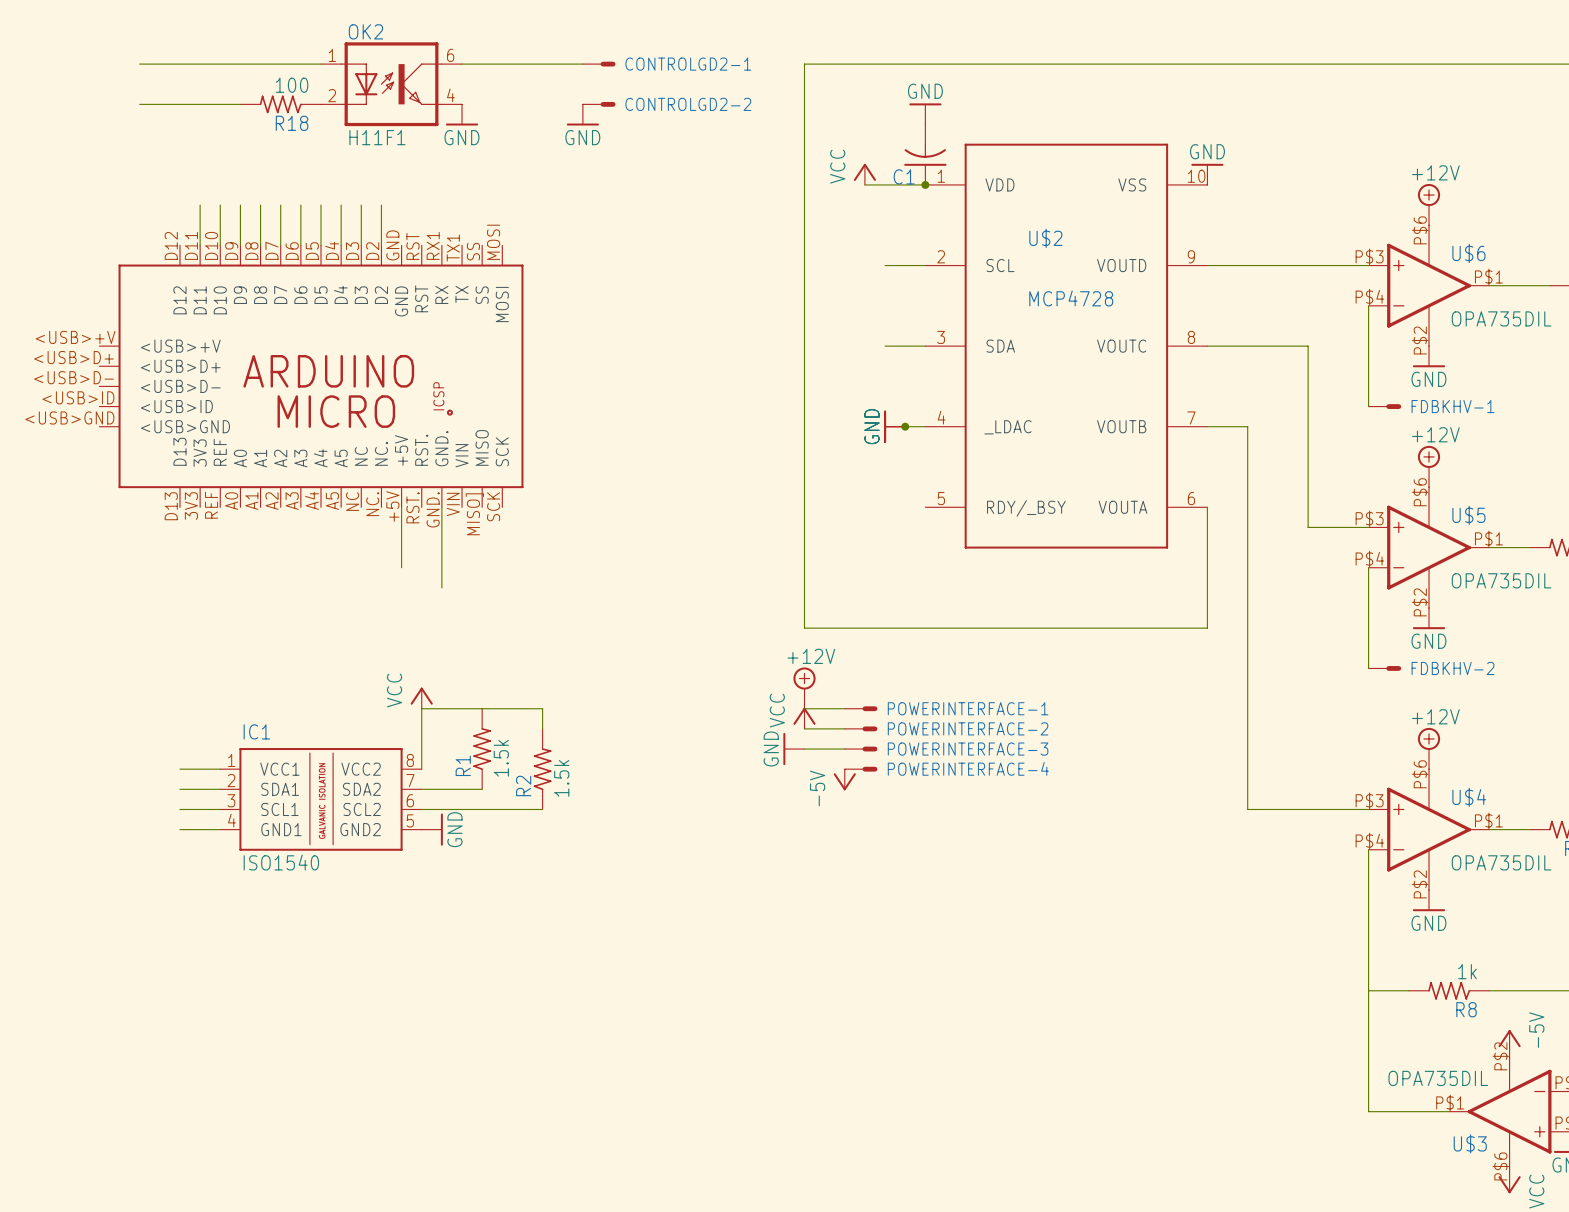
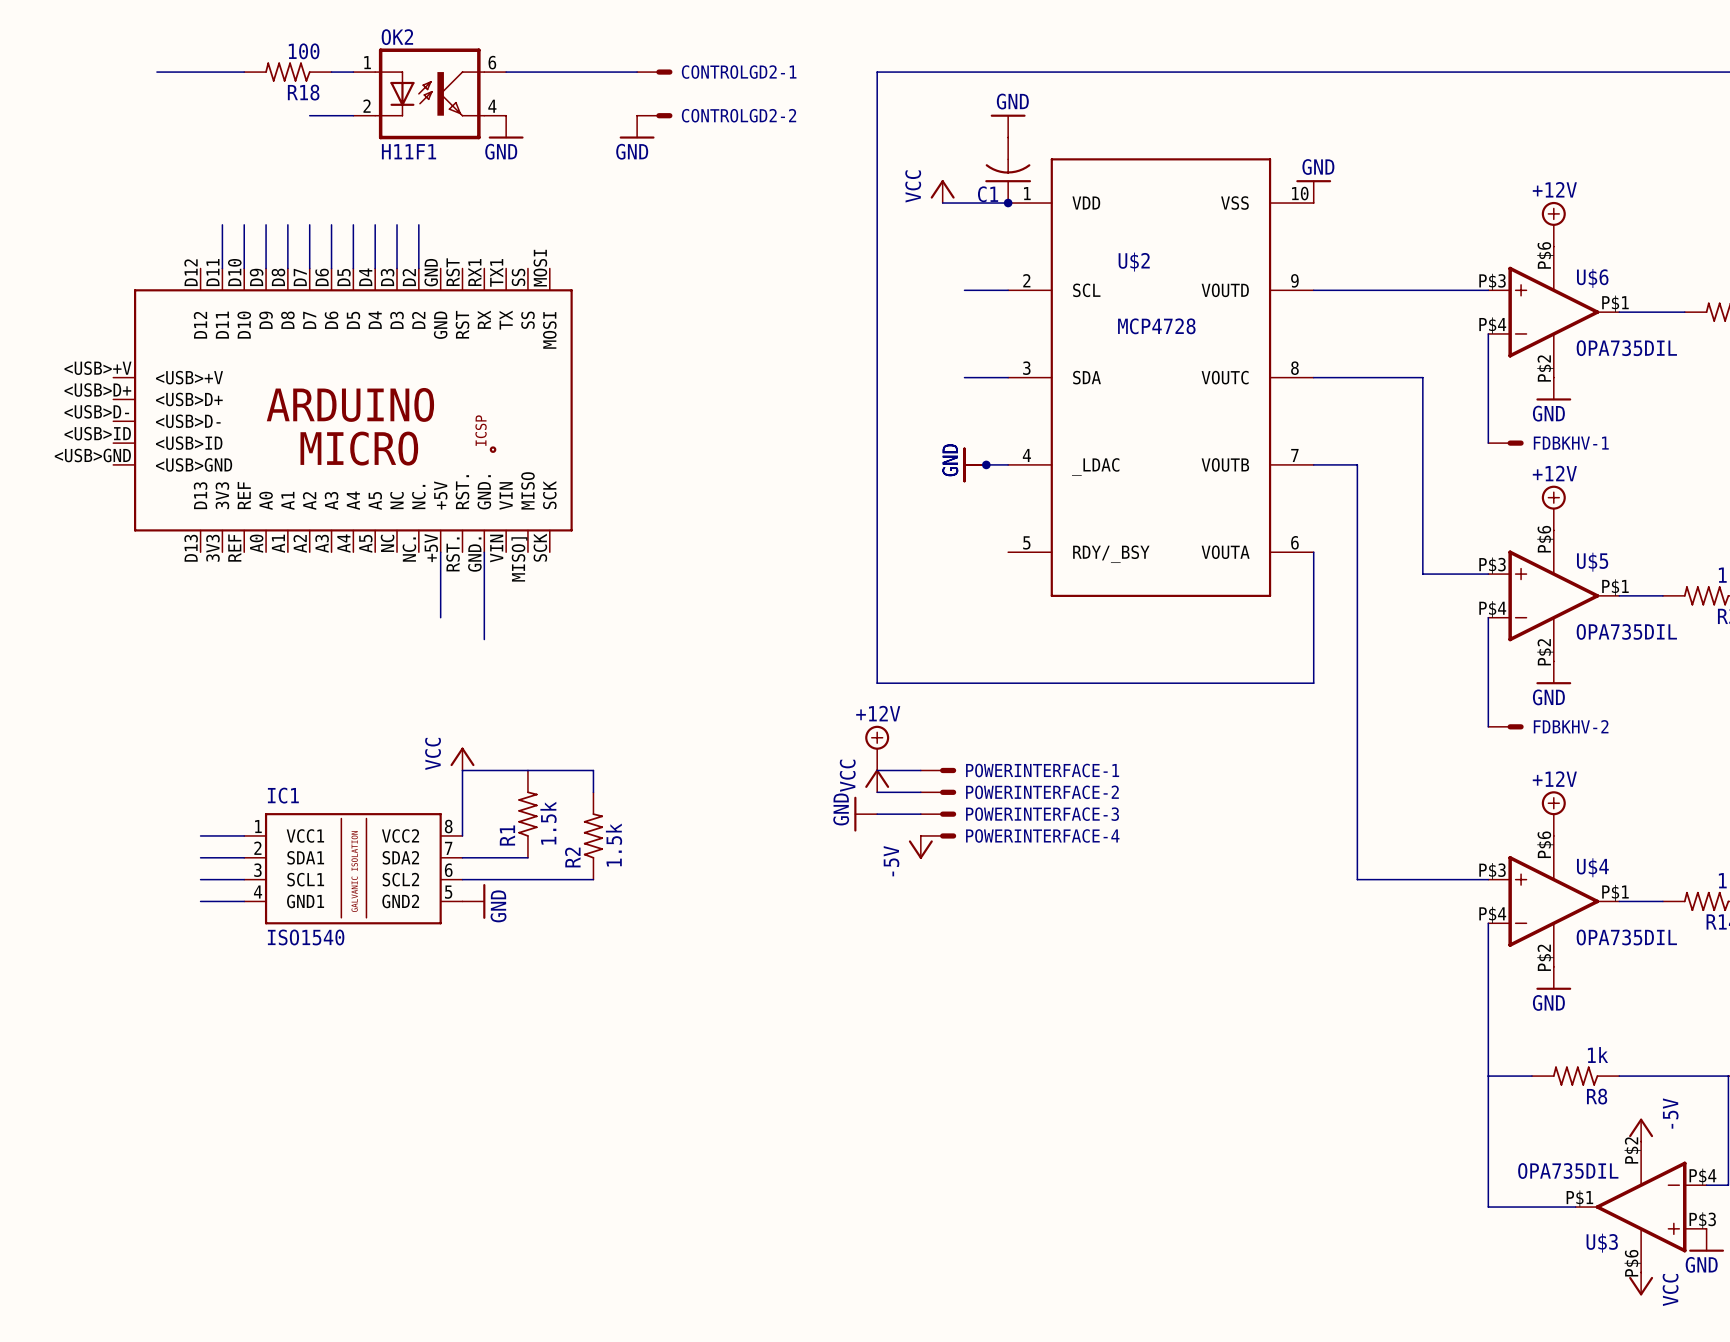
wire: (139, 104) (240, 104) -> none
R18 position: (280, 104) -> (287, 72)

